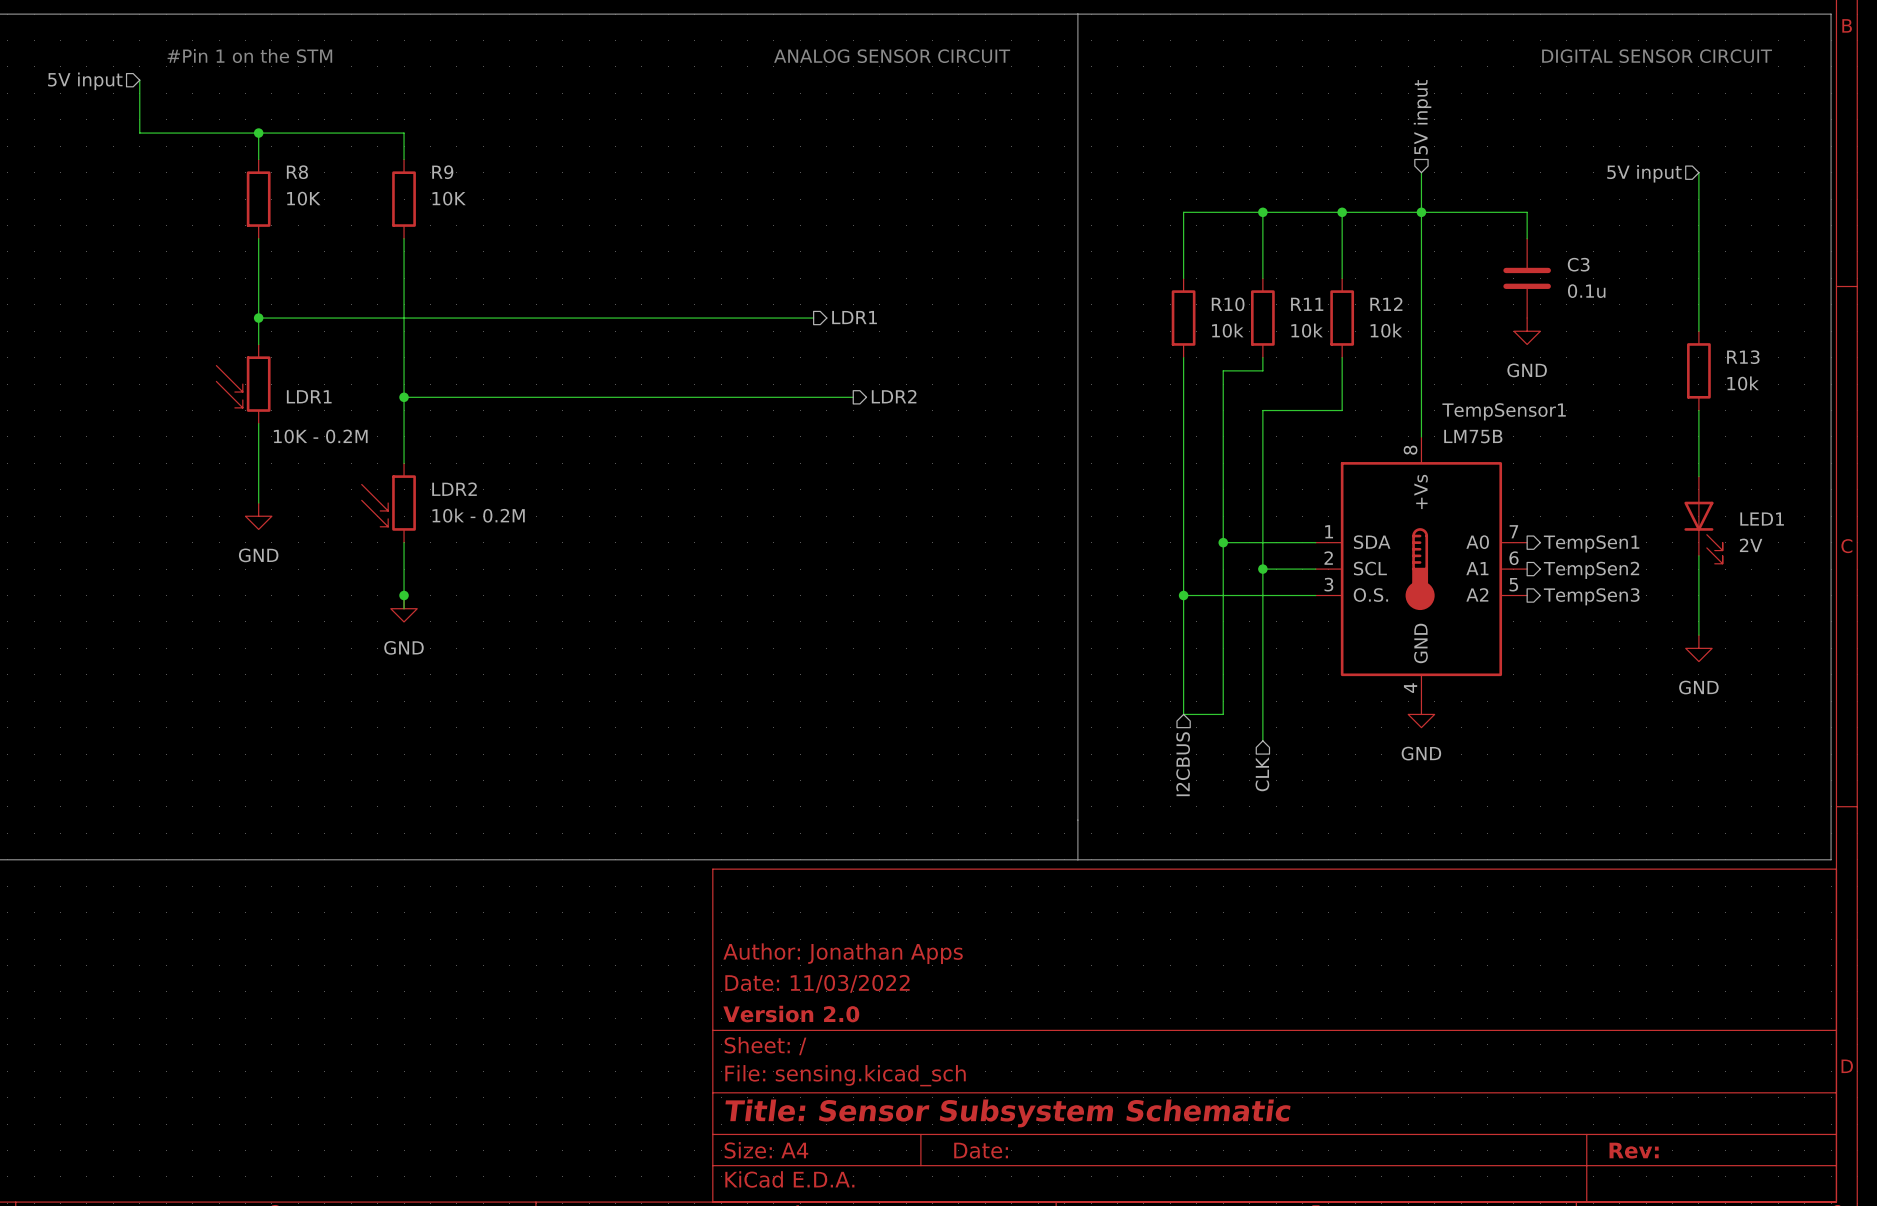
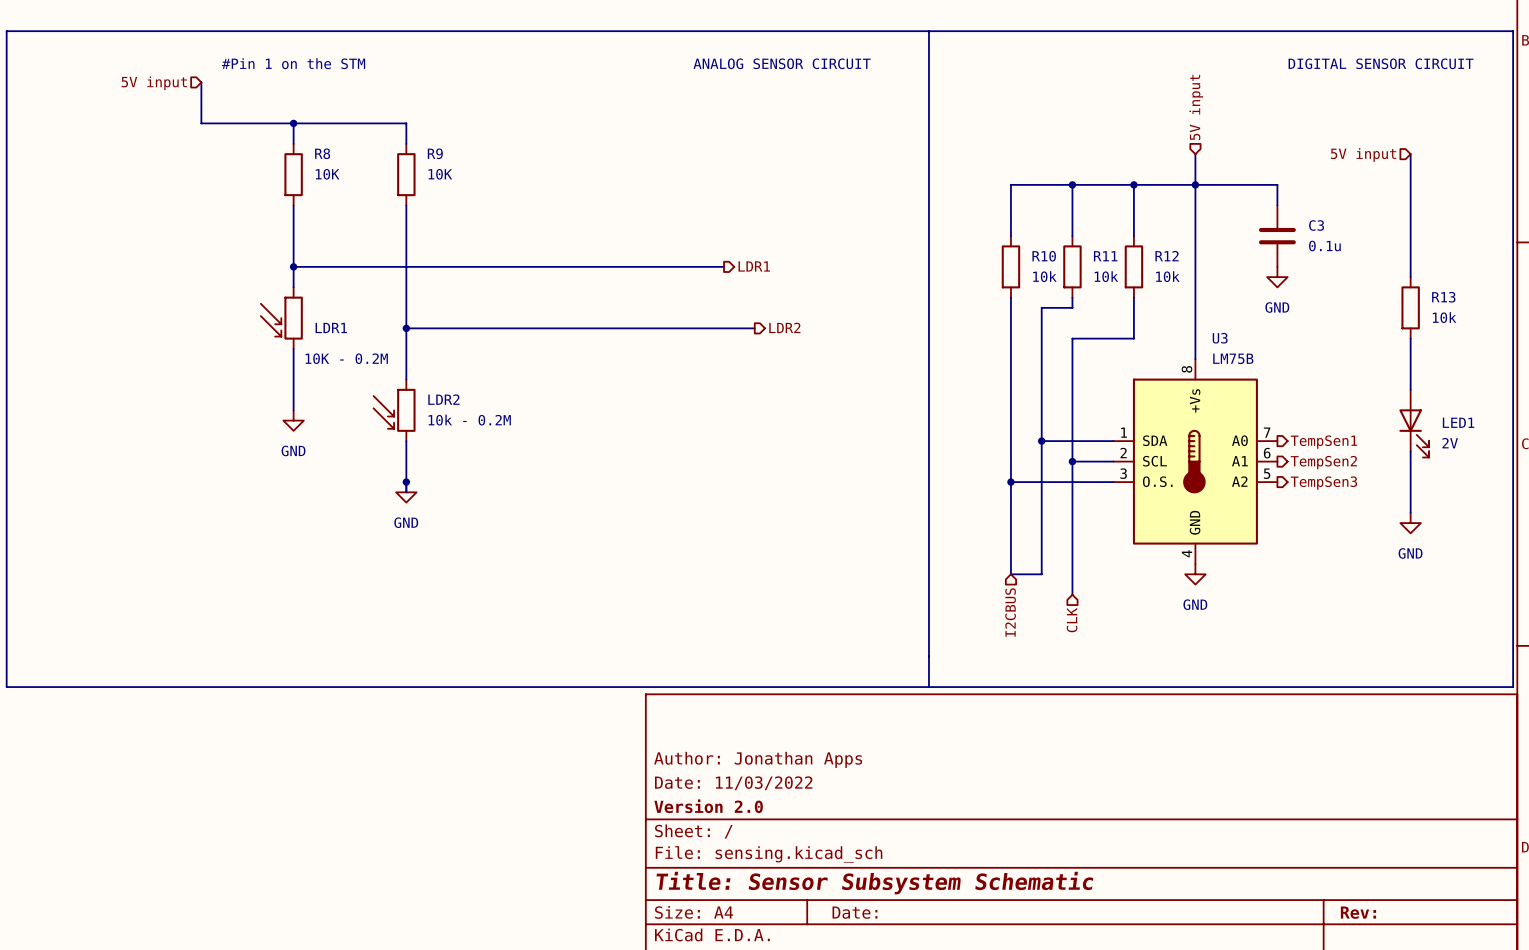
TempSensor1 name: TempSensor1 (1504, 411) -> U3 (1220, 338)

